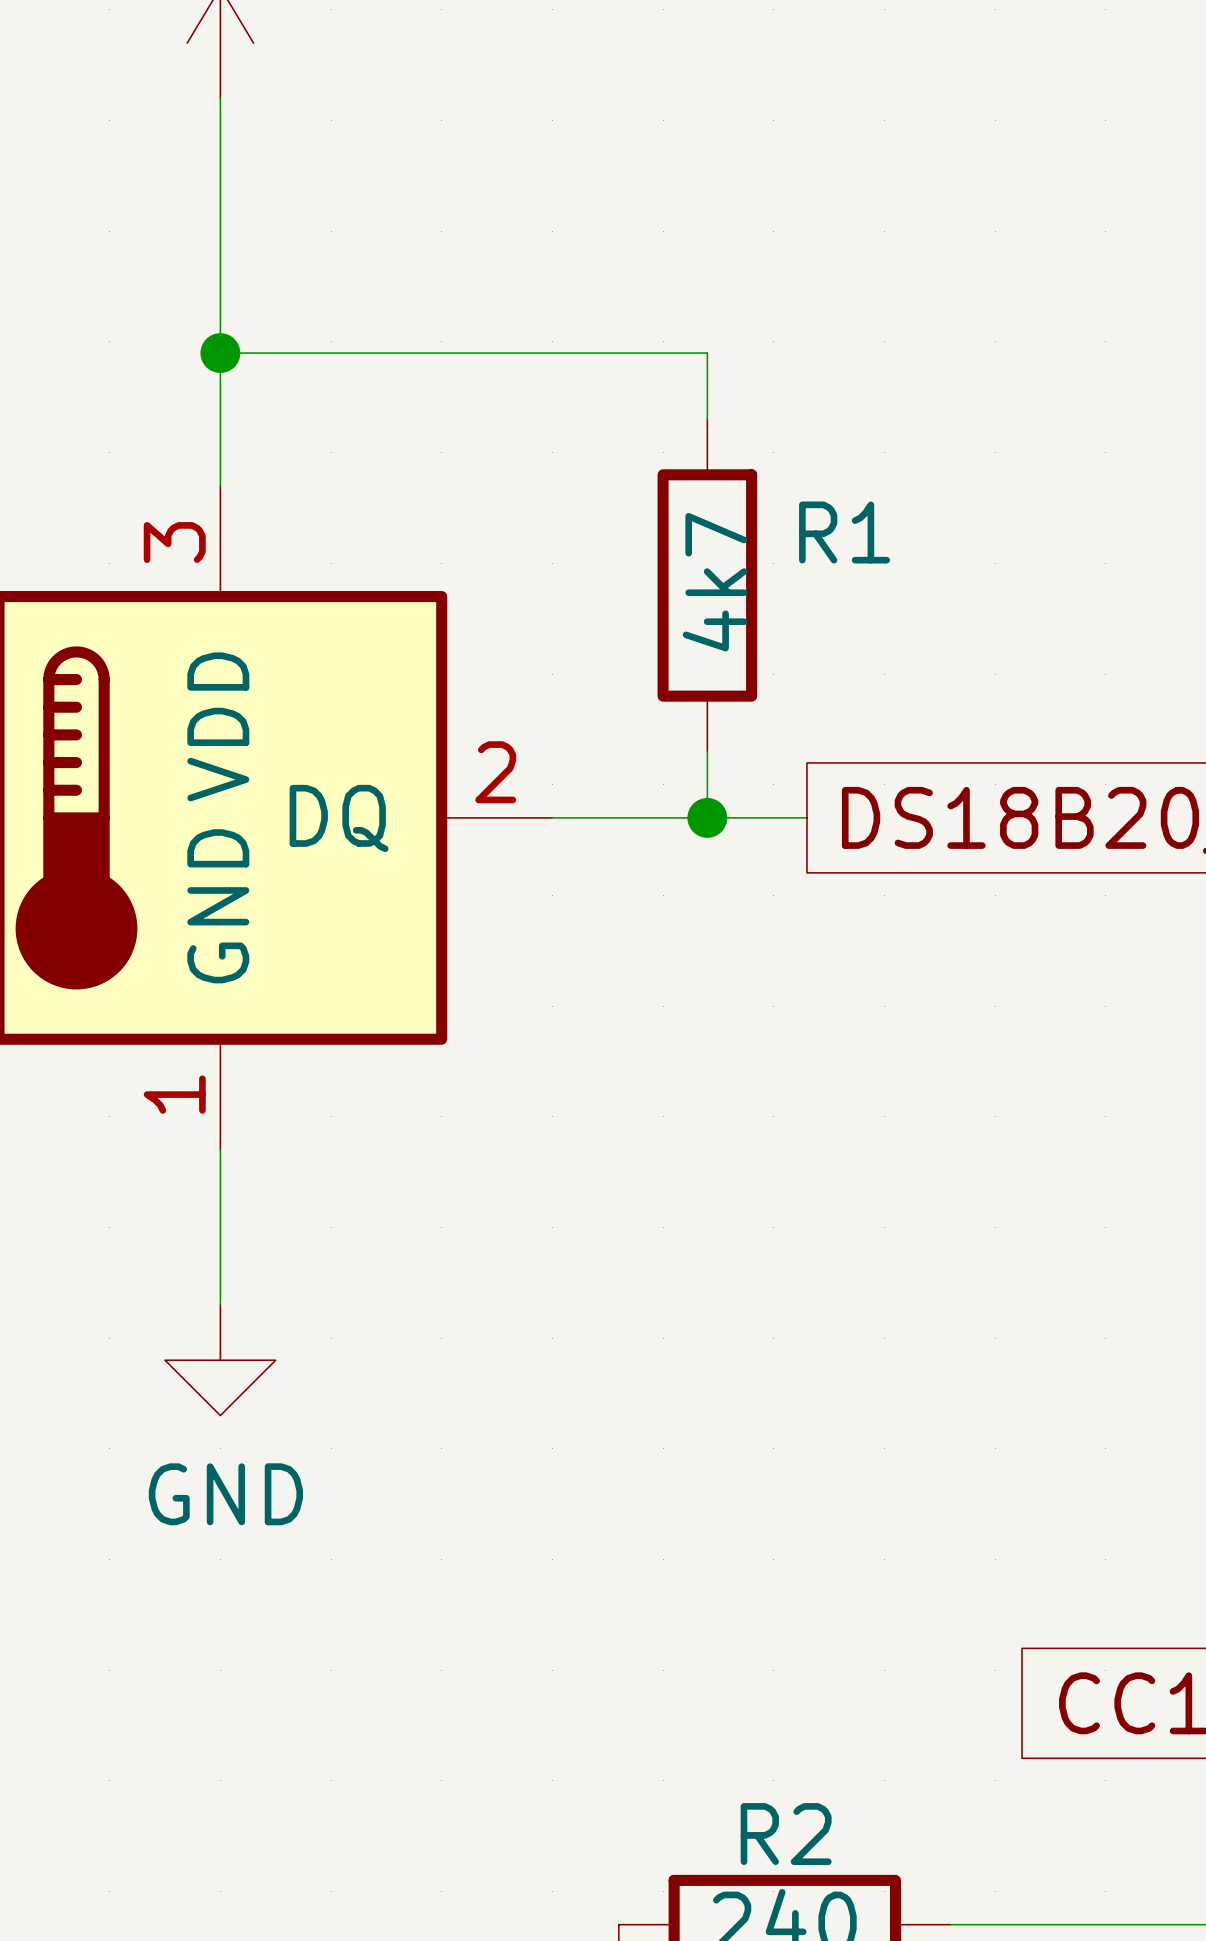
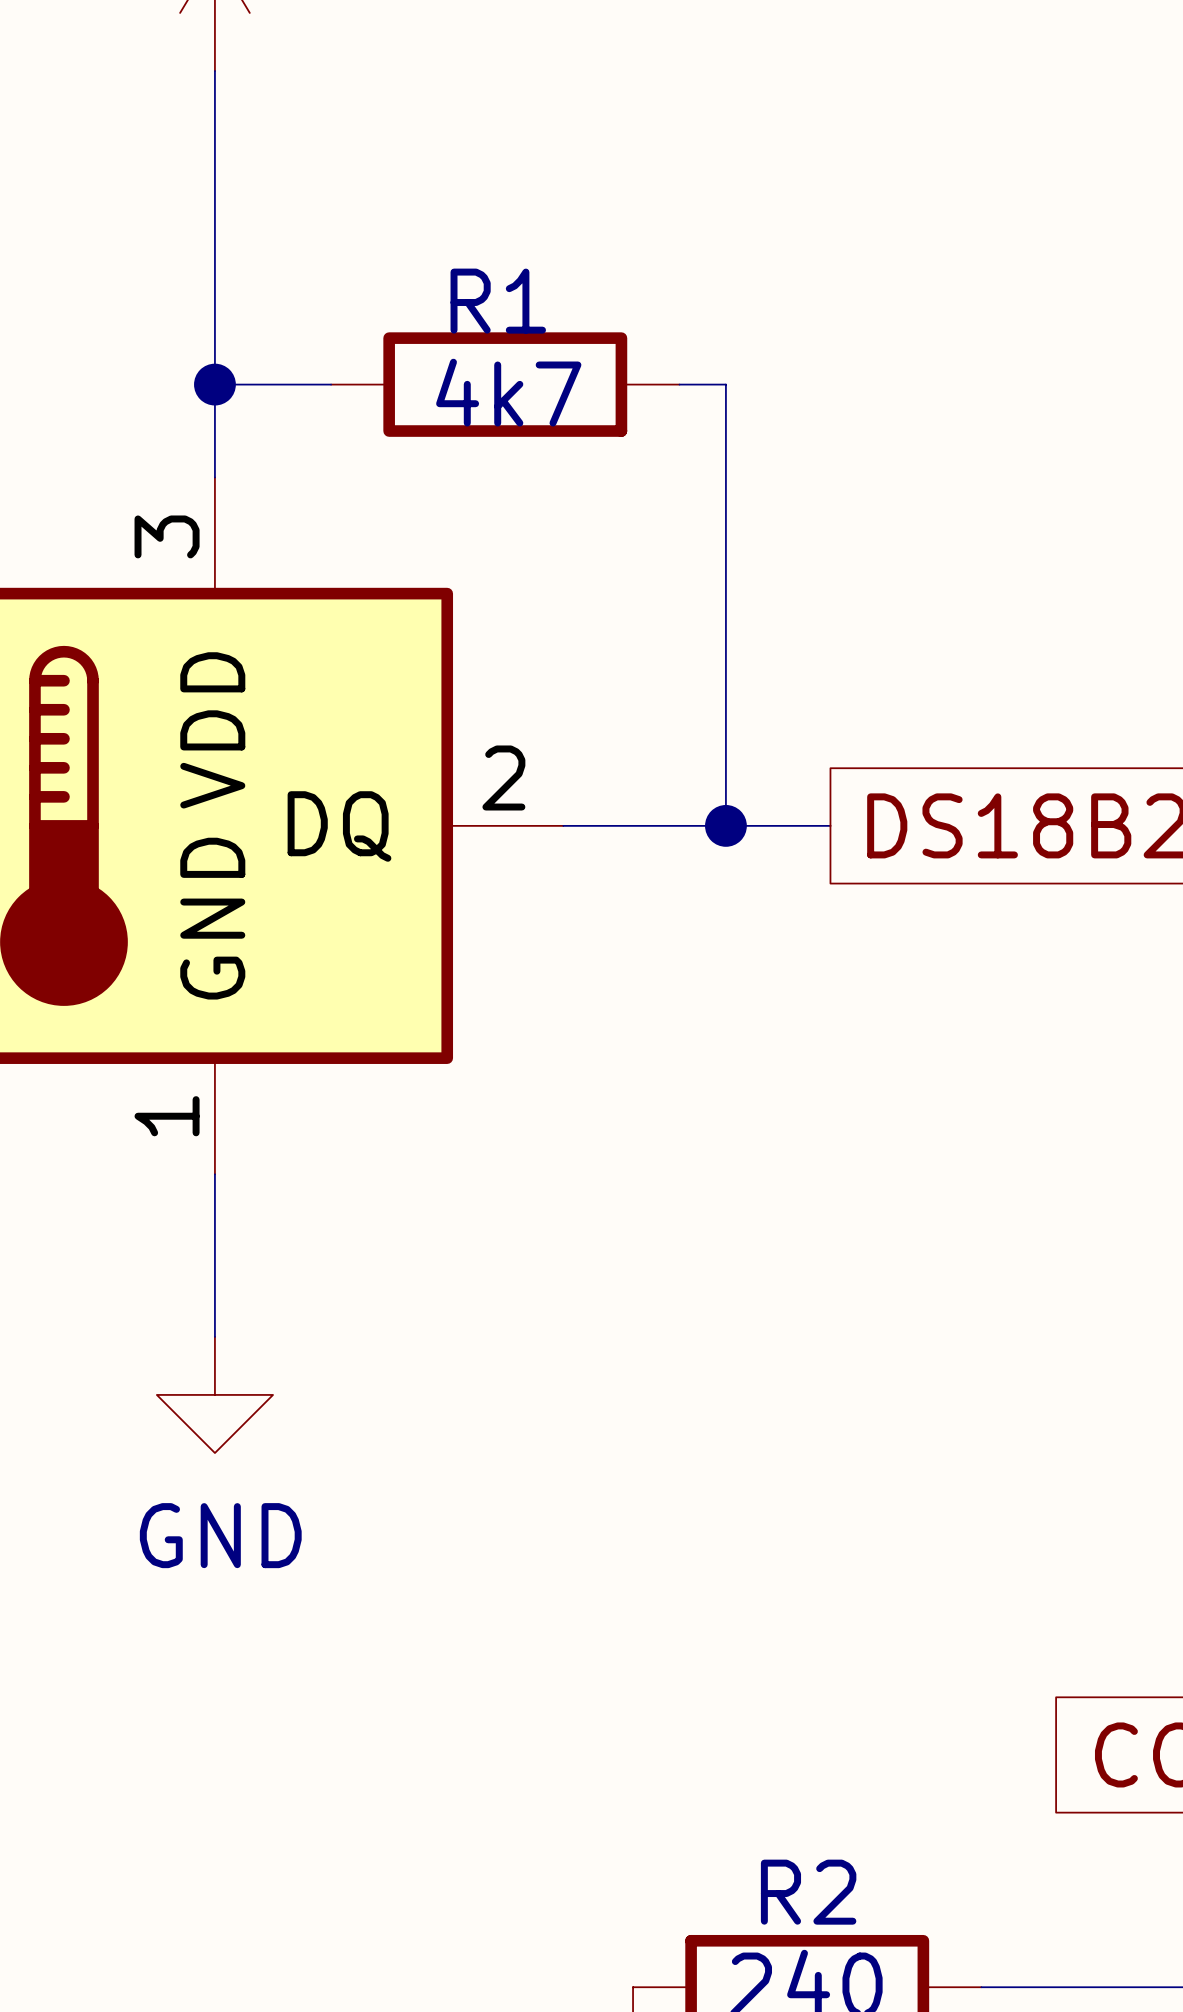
wire: (220, 353) (707, 353) (707, 397) -> (679, 384) (725, 384)
junction position: (220, 353) -> (214, 384)
wire: none -> (214, 384) (331, 384)
wire: none -> (725, 407) (725, 756)
R1 name position: R1 (844, 532) -> R1 (498, 301)
R1 rotation: 0° (707, 585) -> 90° clockwise (505, 384)
R1 position: (707, 585) -> (505, 384)

